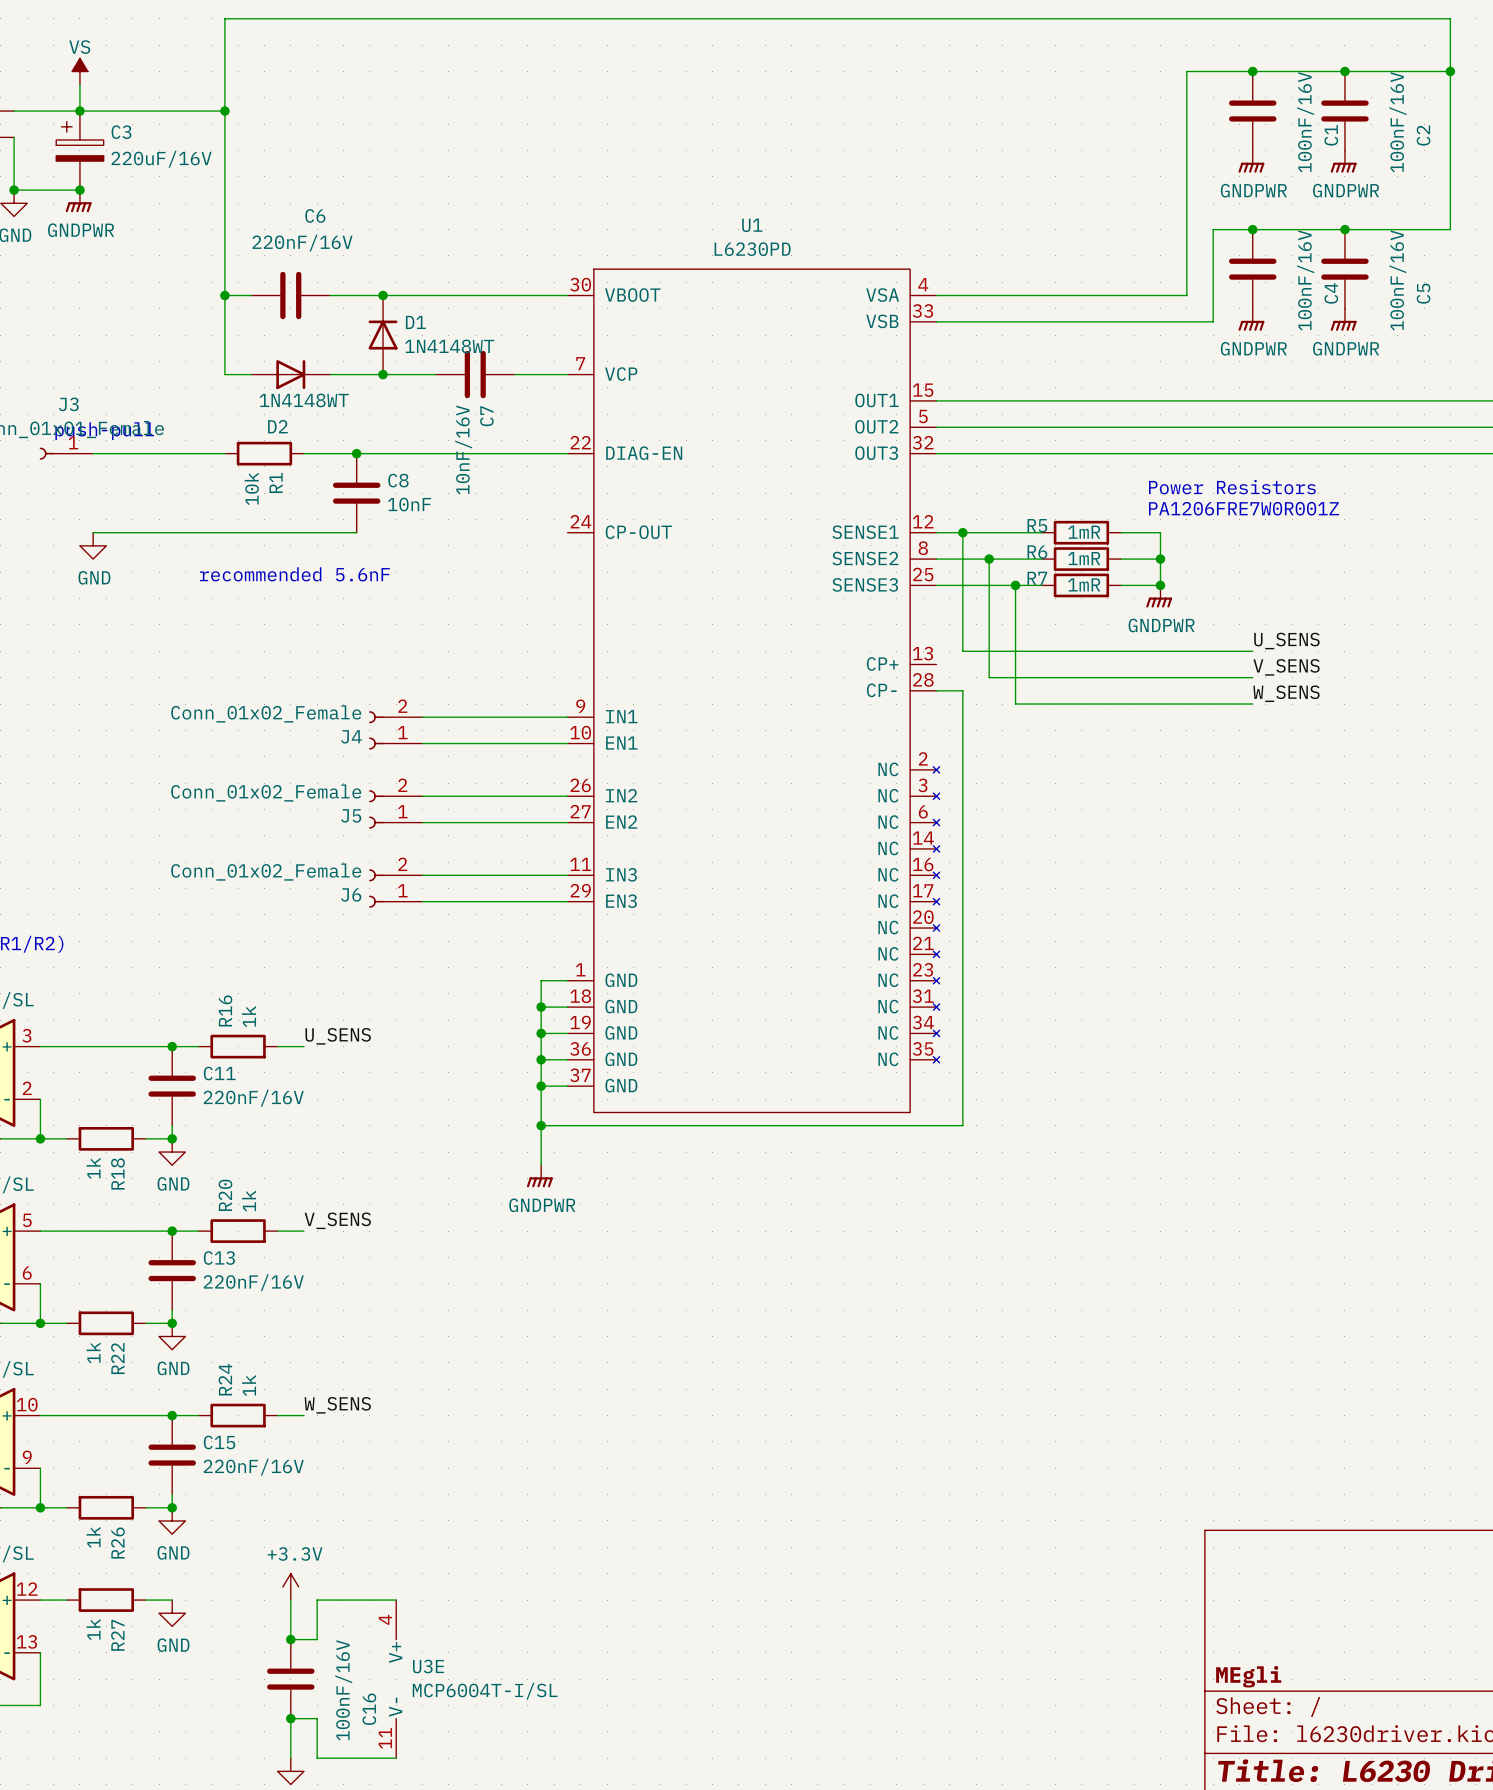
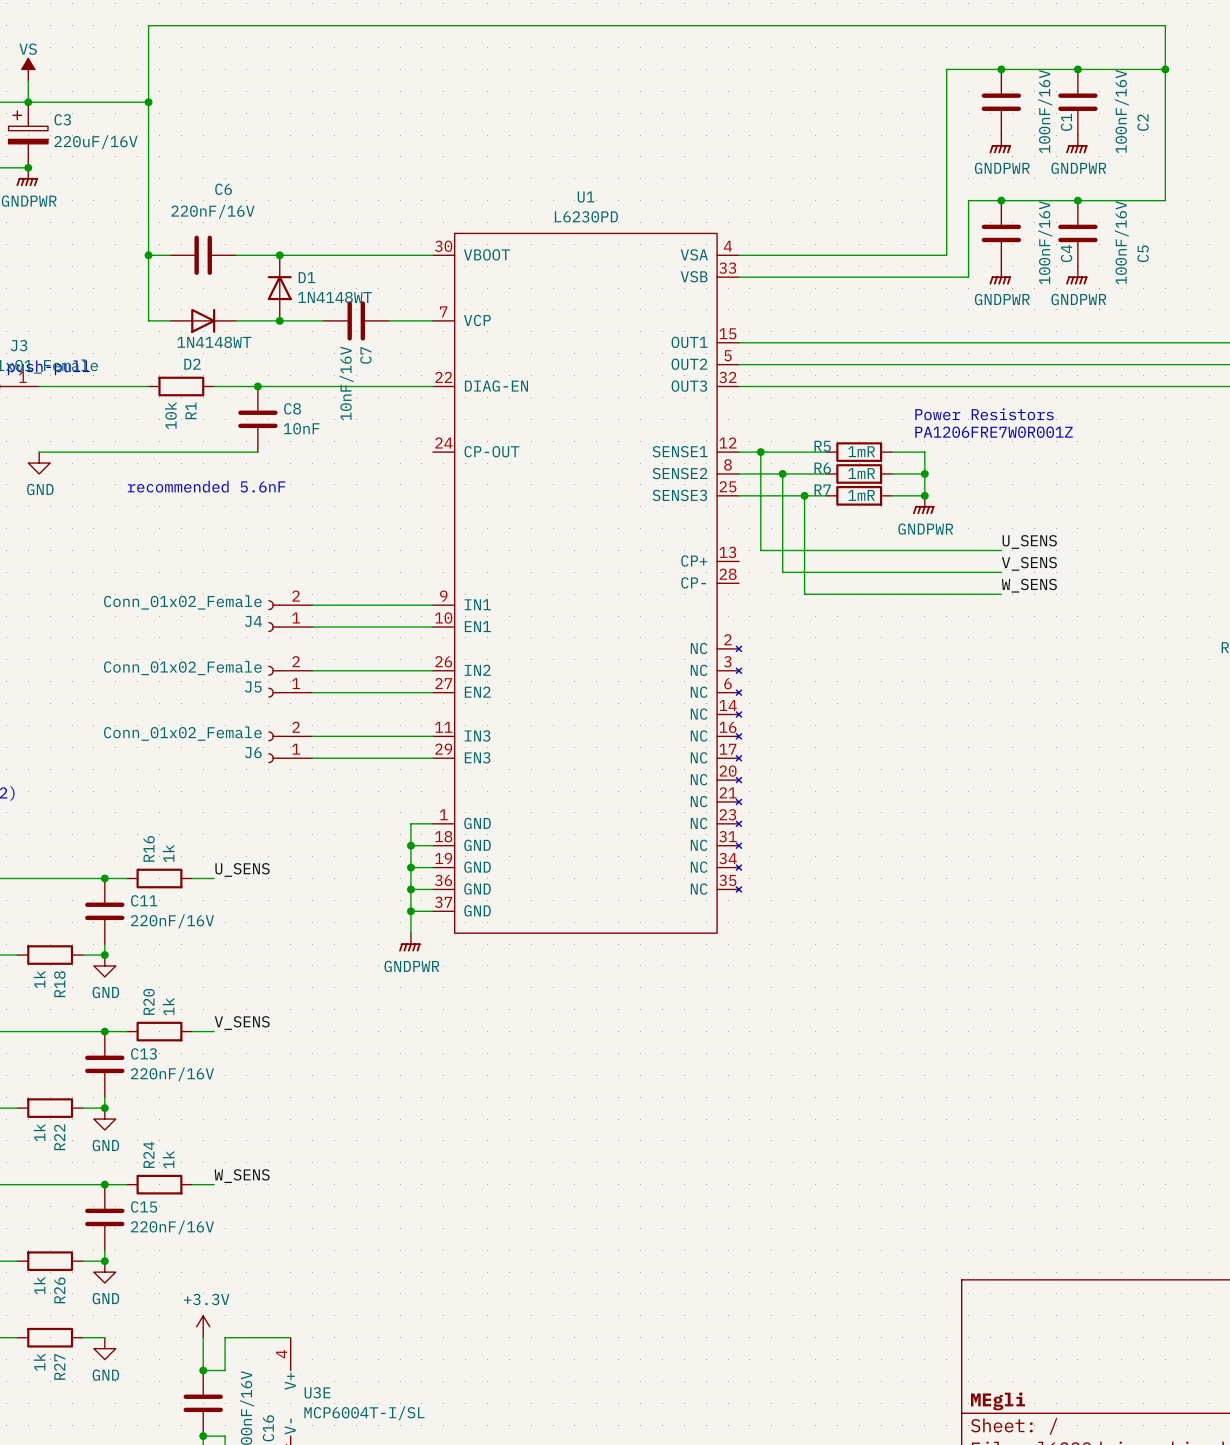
wire: (936, 690) (962, 690) (962, 1125) (541, 1125) -> none
wire: (541, 1112) (541, 1165) -> none
junction: (541, 1125) -> none
power symbol position: GNDPWR (539, 1176) -> GNDPWR (409, 942)

